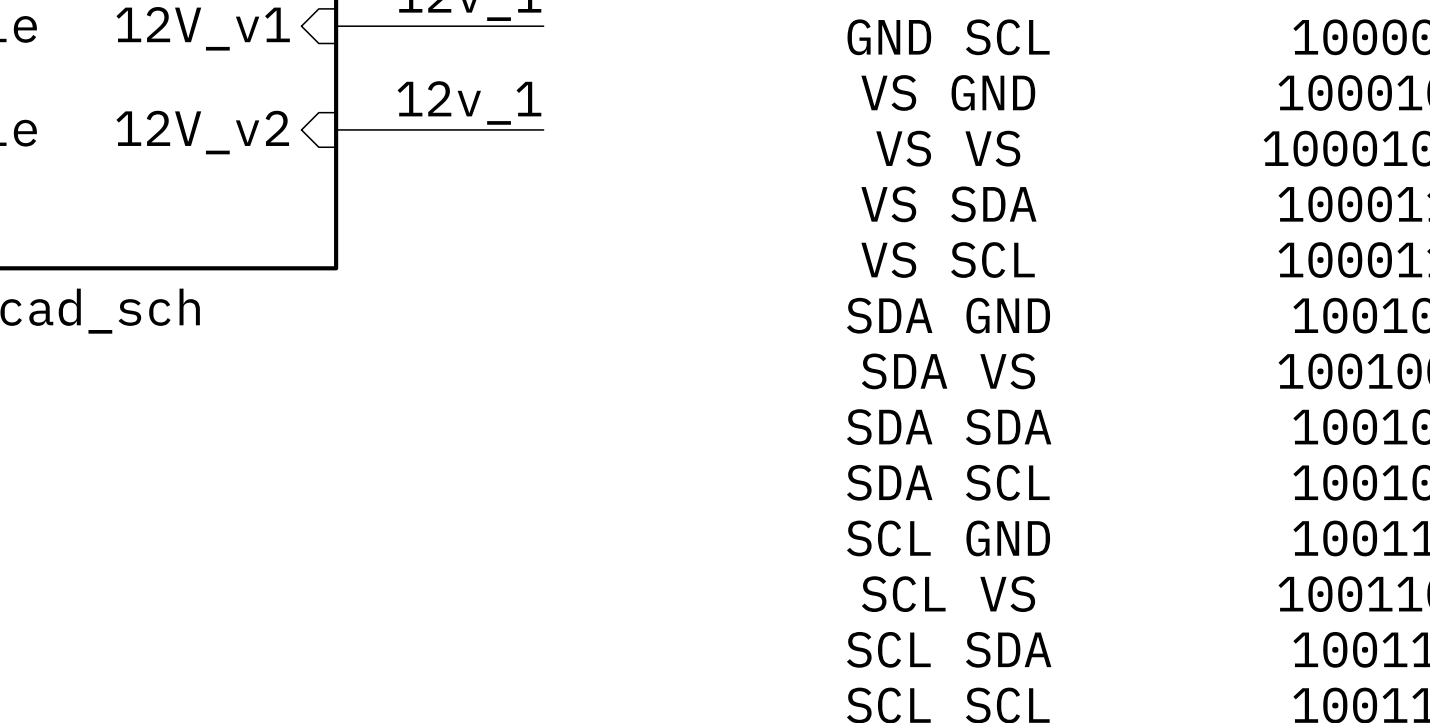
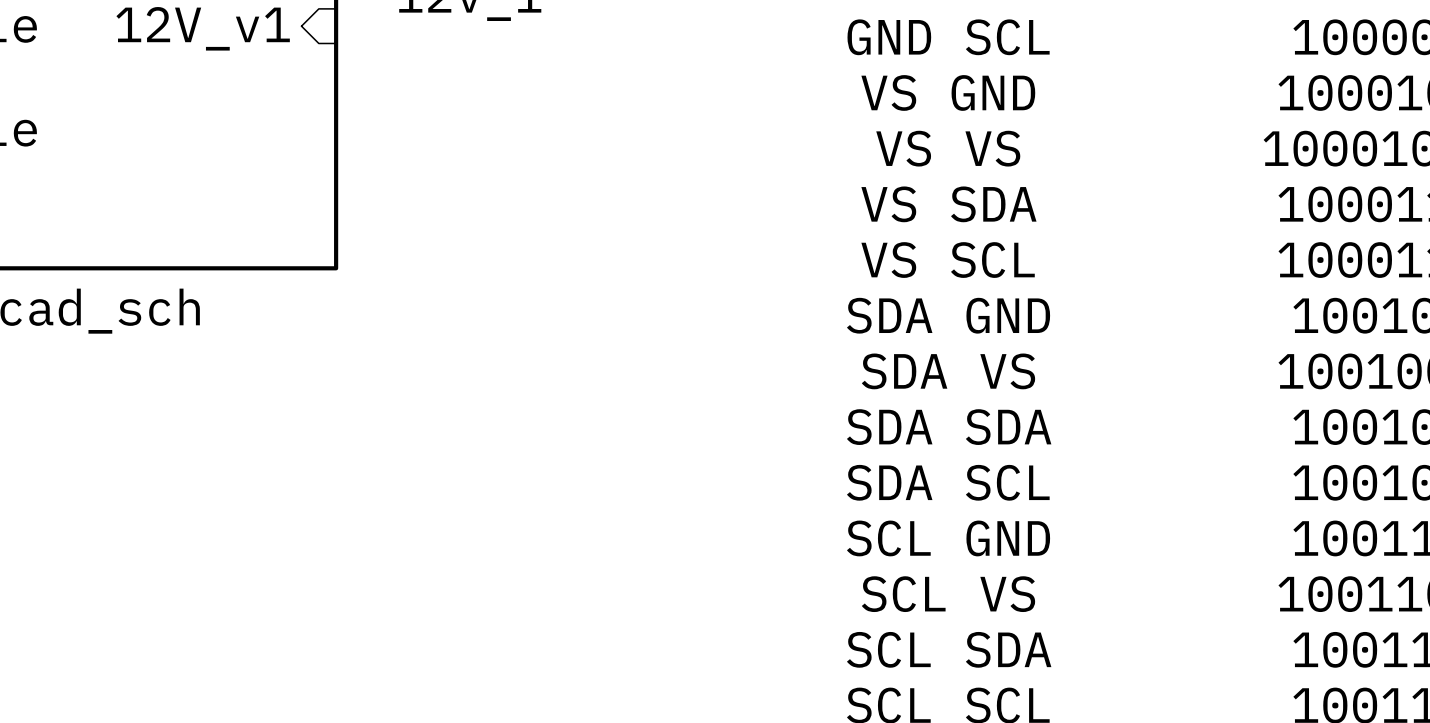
wire: (336, 26) (543, 26) -> none
label: 12v_1 (469, 102) -> none
wire: (336, 129) (543, 129) -> none
sheet pin: 12V_v2 (202, 132) -> none

